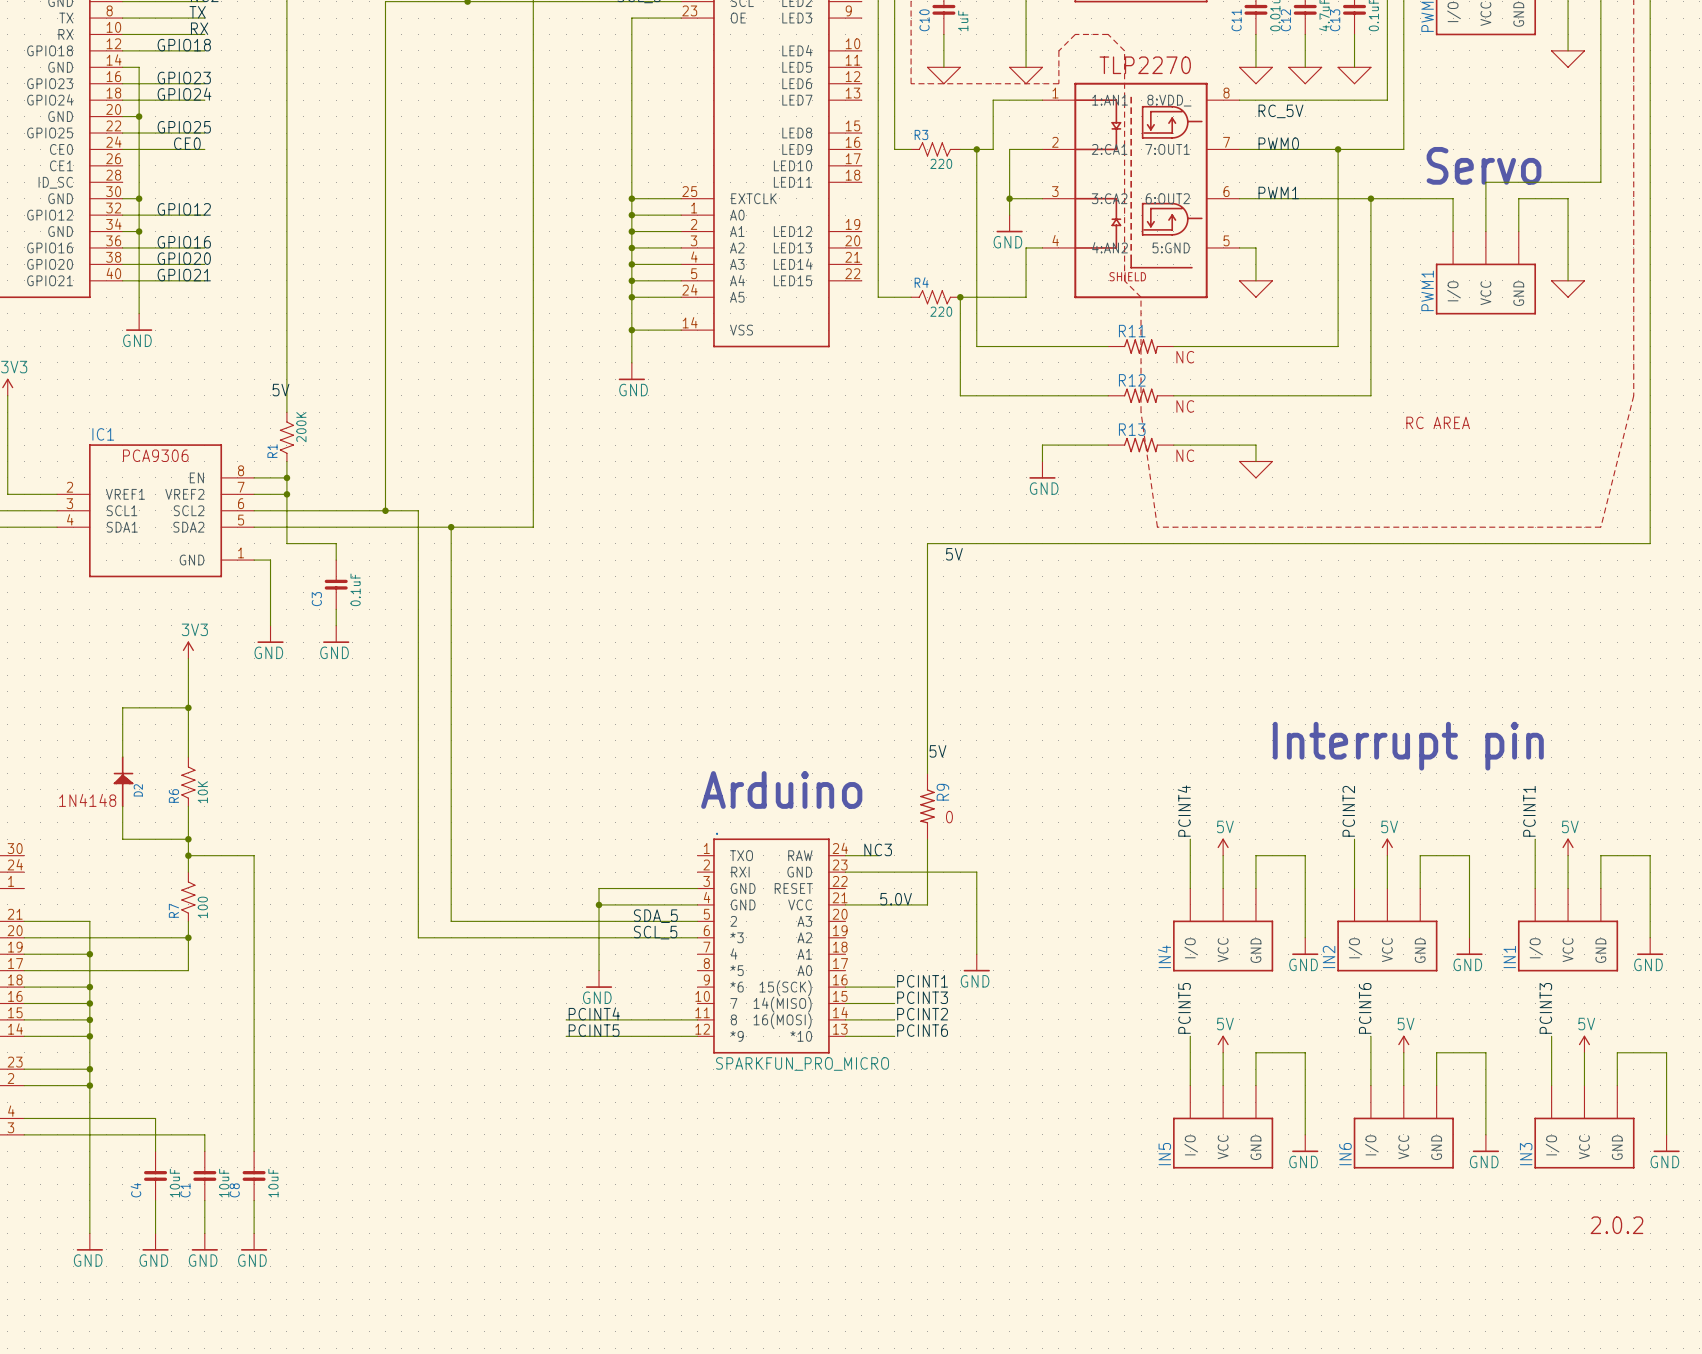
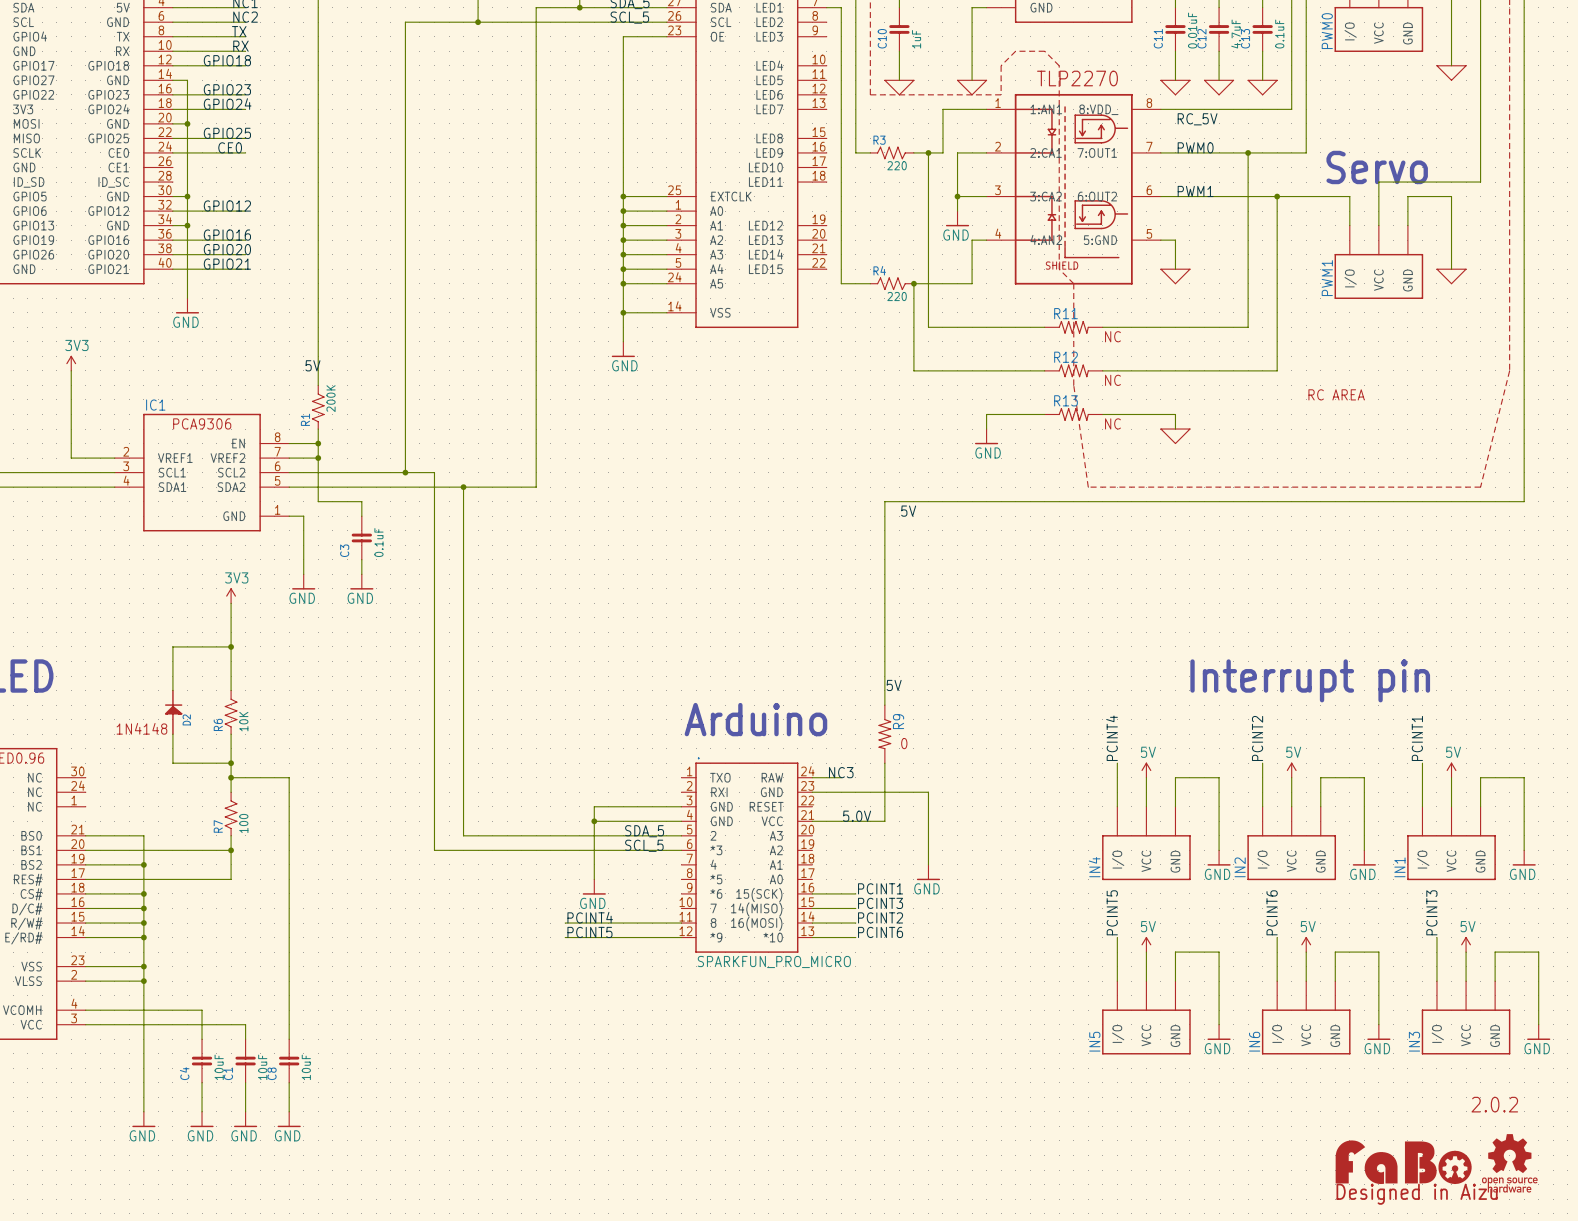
part: none -> (1403, 1162)
part: none -> (1509, 1163)

